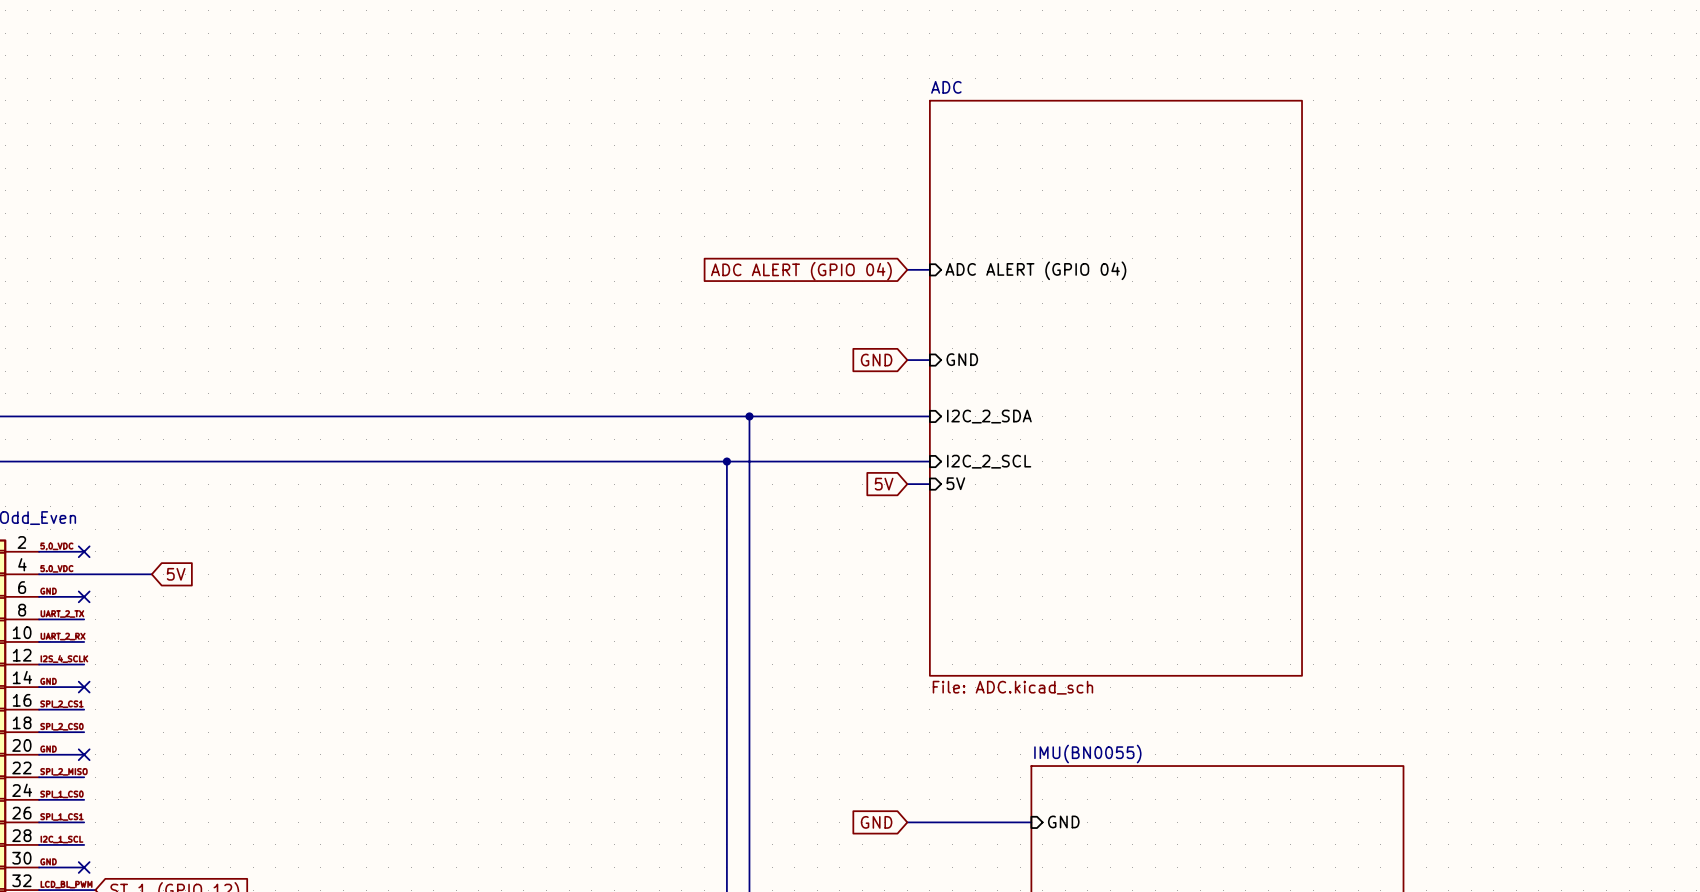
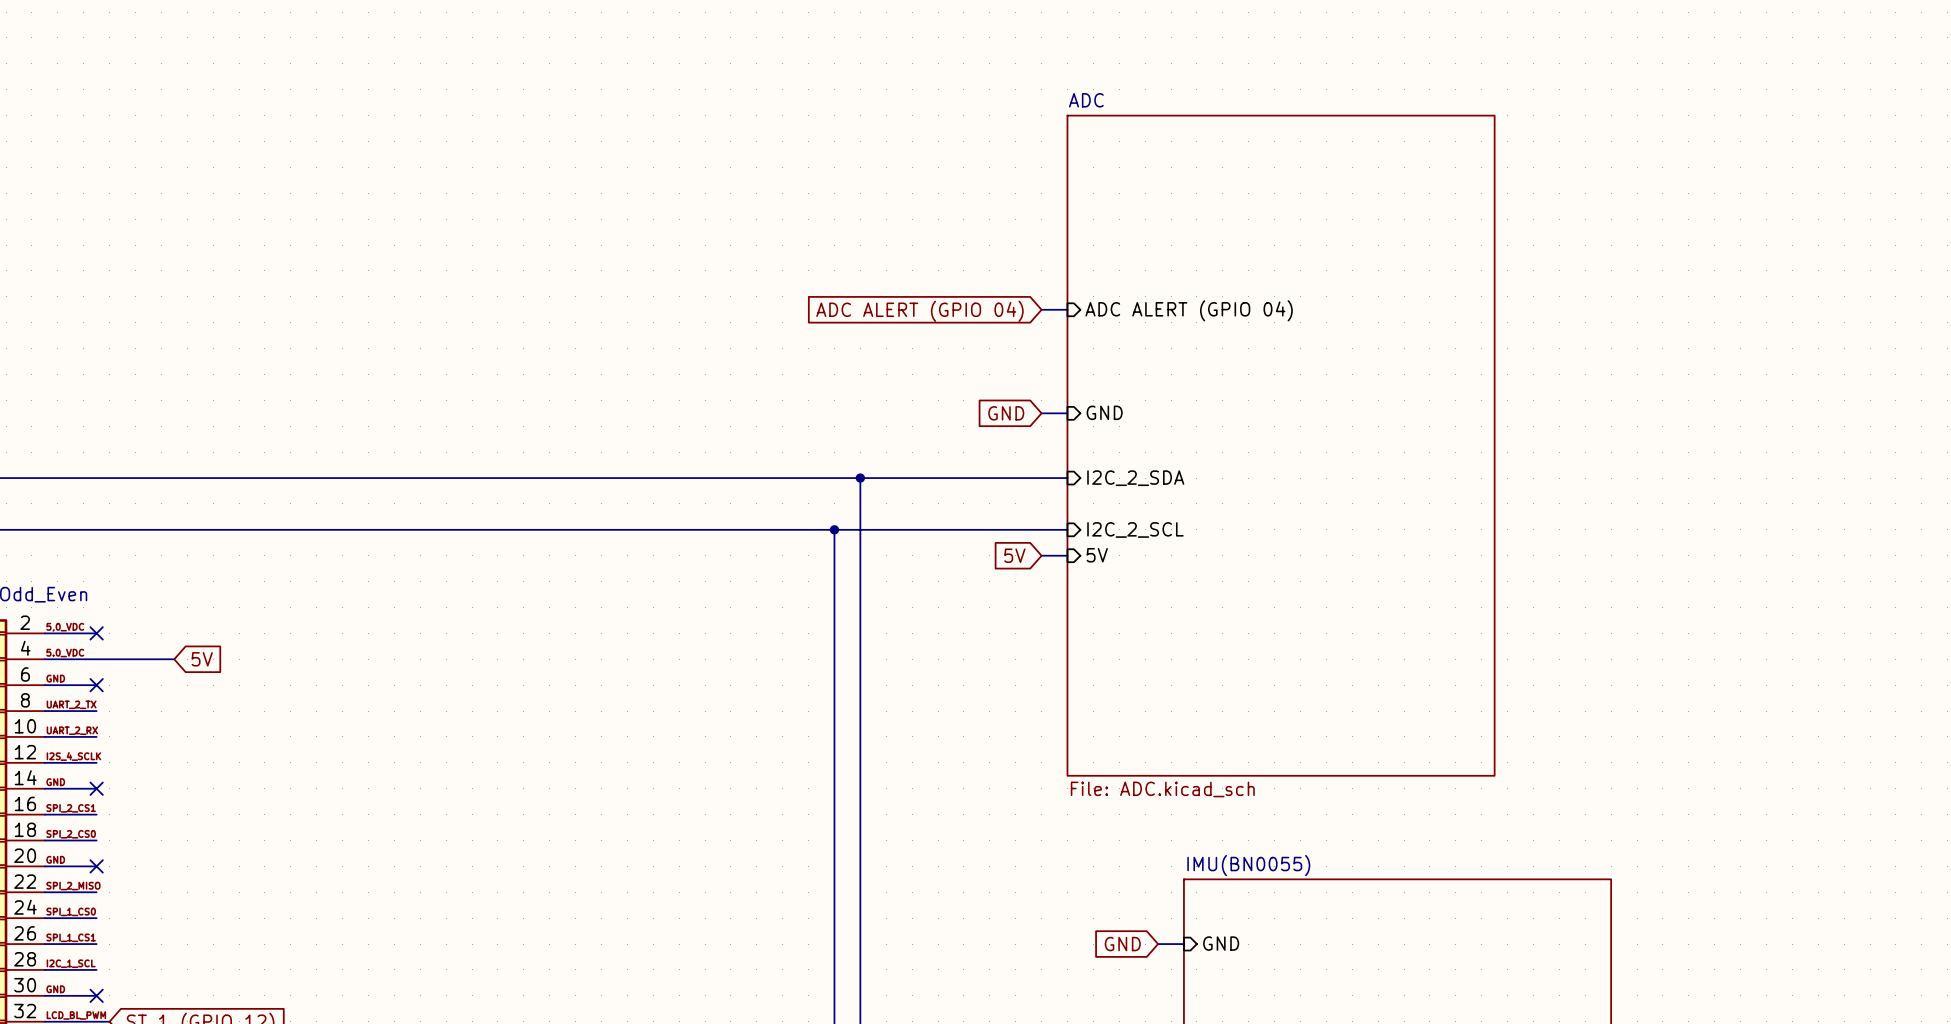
global label position: GND (876, 822) -> GND (1122, 944)
wire: (907, 822) (1008, 822) -> none

